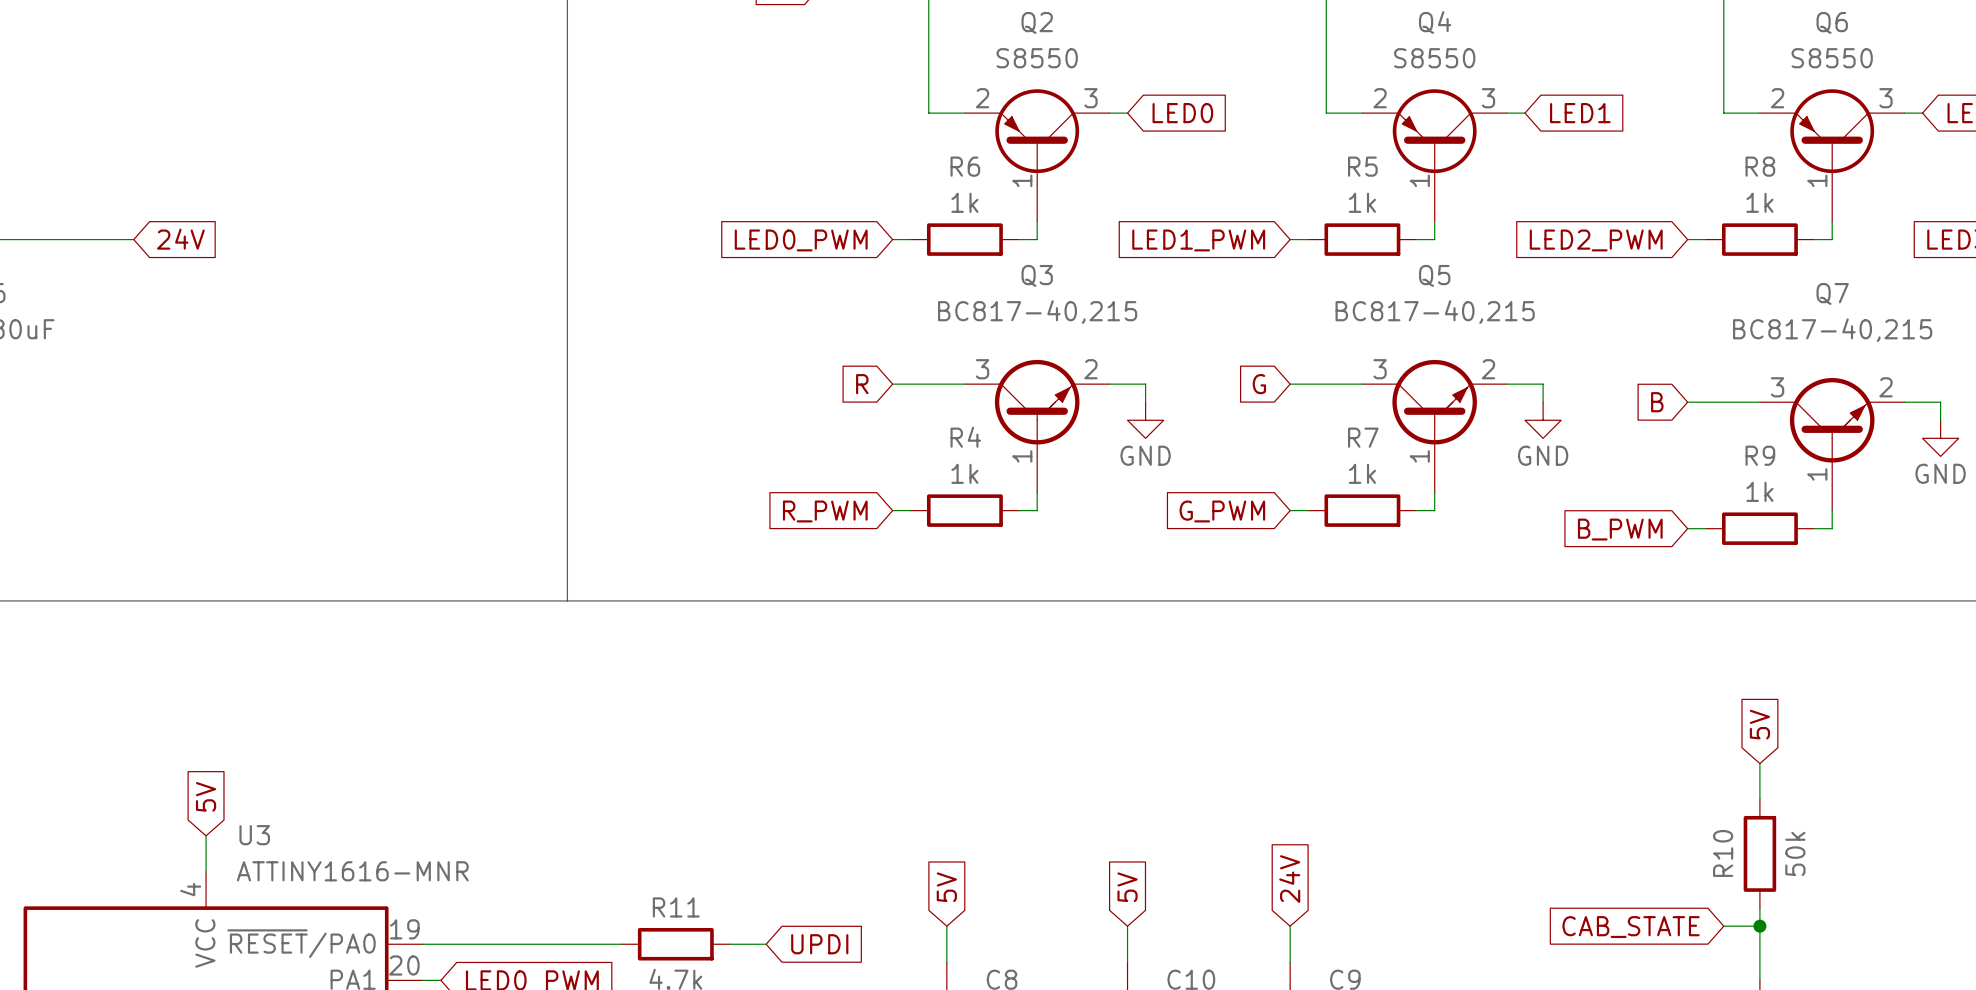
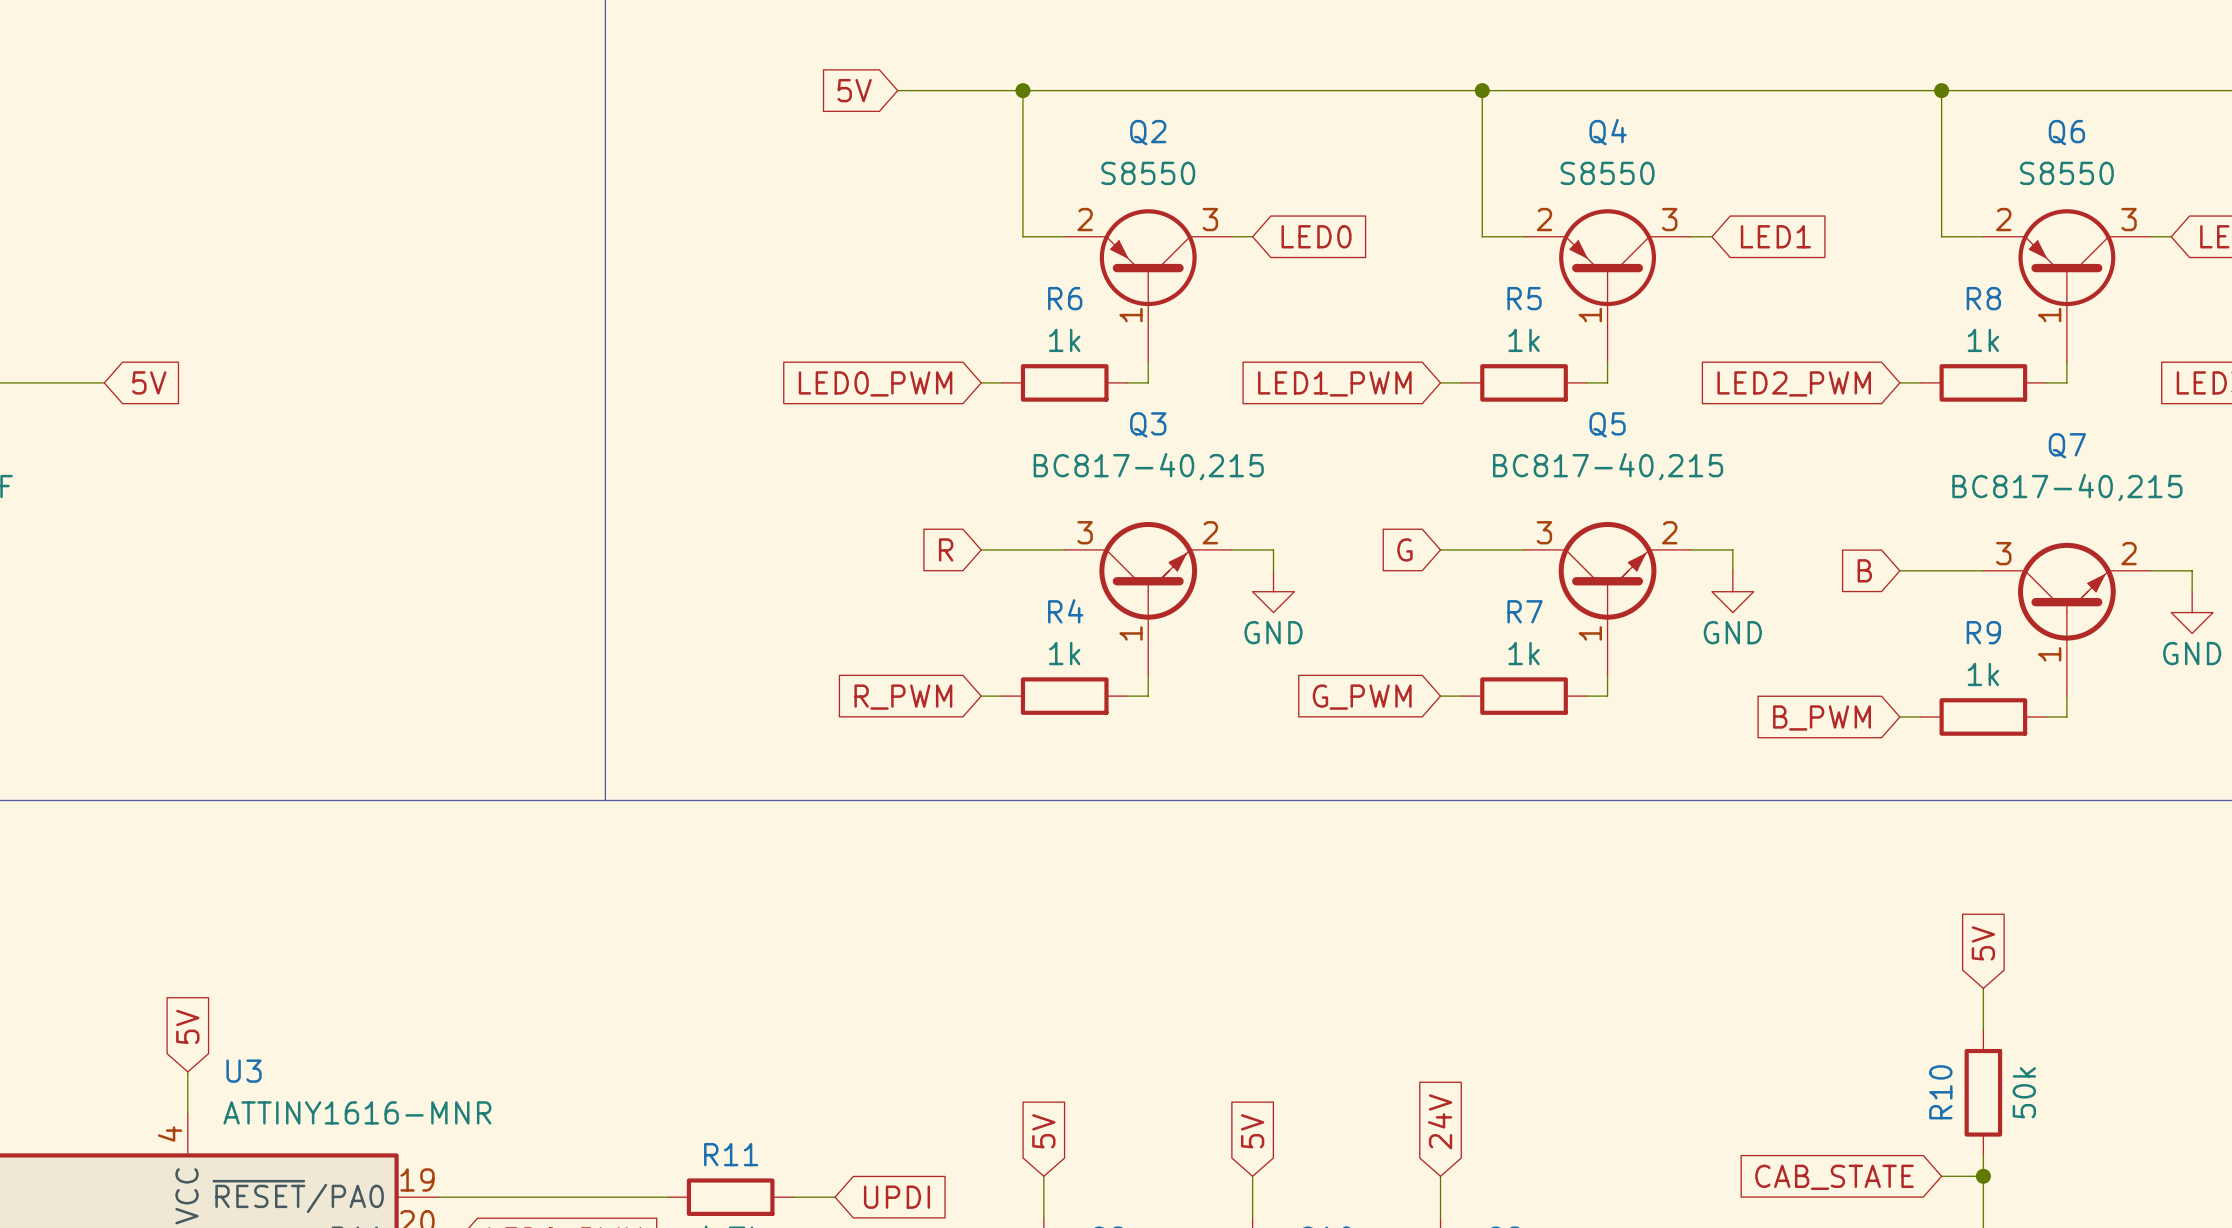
global label: 24V (180, 239) -> 5V (149, 382)

